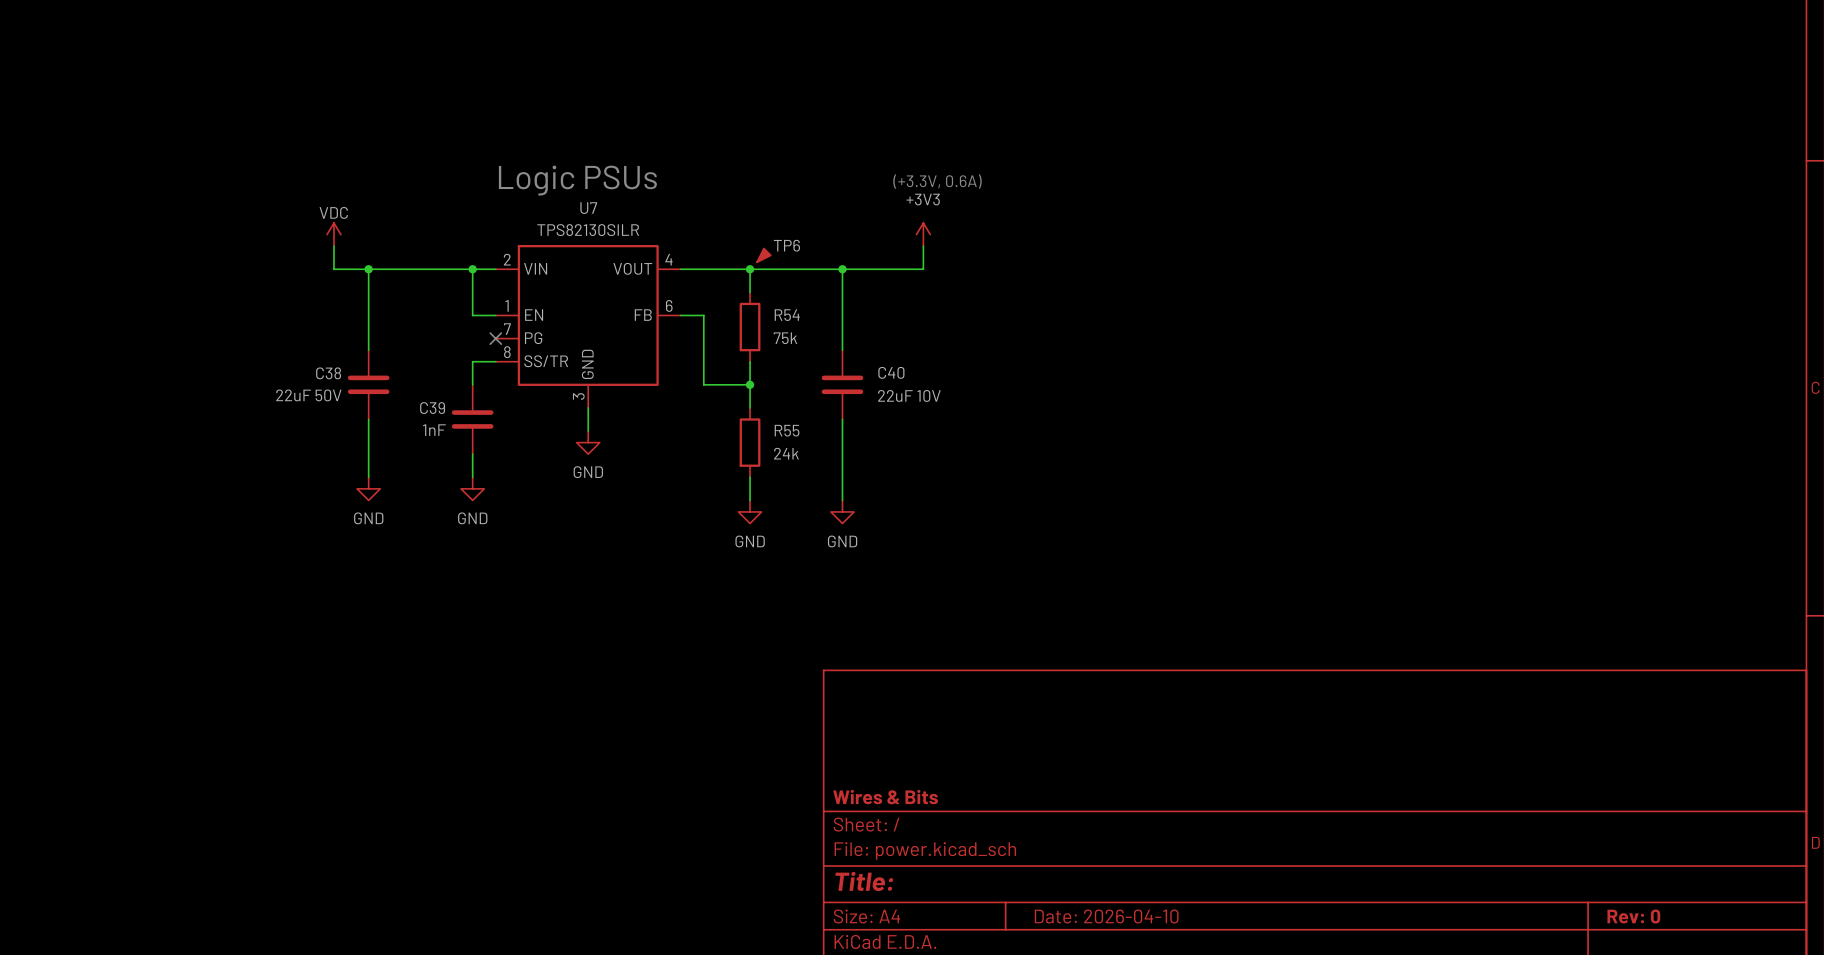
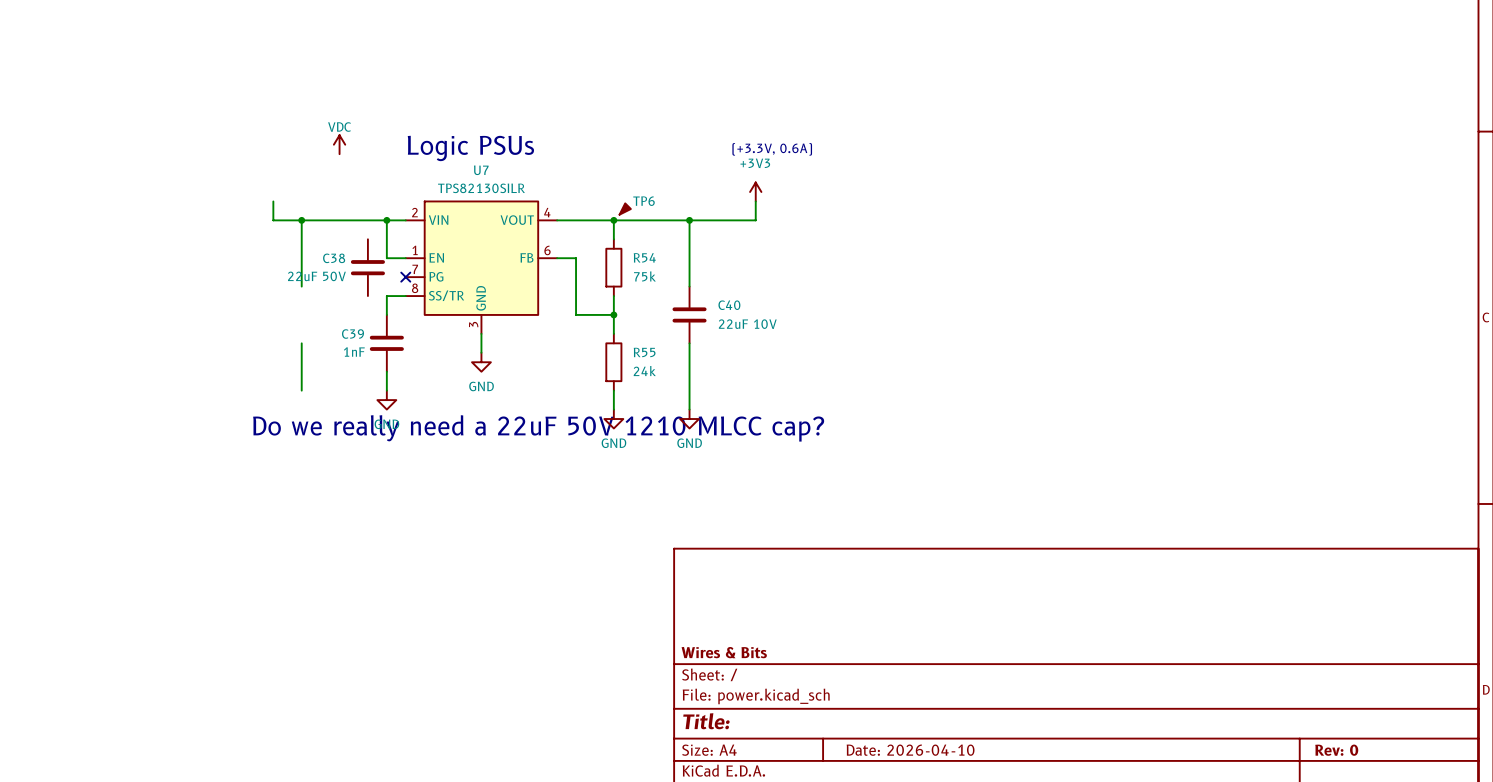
power symbol position: VDC (333, 234) -> VDC (339, 144)
C38 position: (368, 384) -> (367, 267)
power symbol: GND (368, 488) -> none
text: none -> Do we really need a 22uF 50V 1210 MLCC cap? (538, 428)

